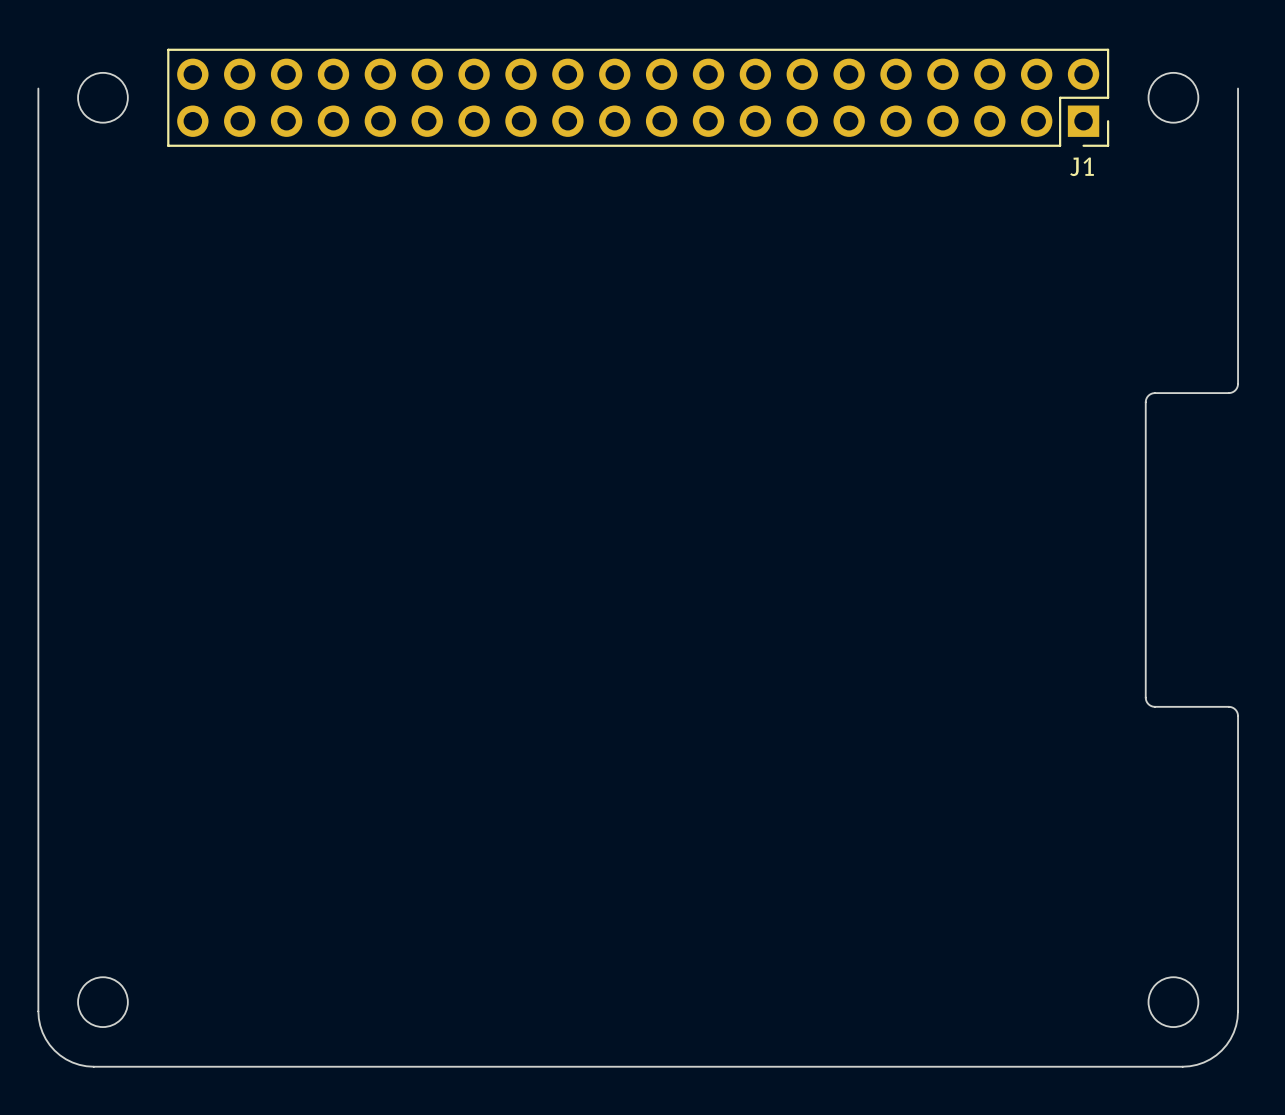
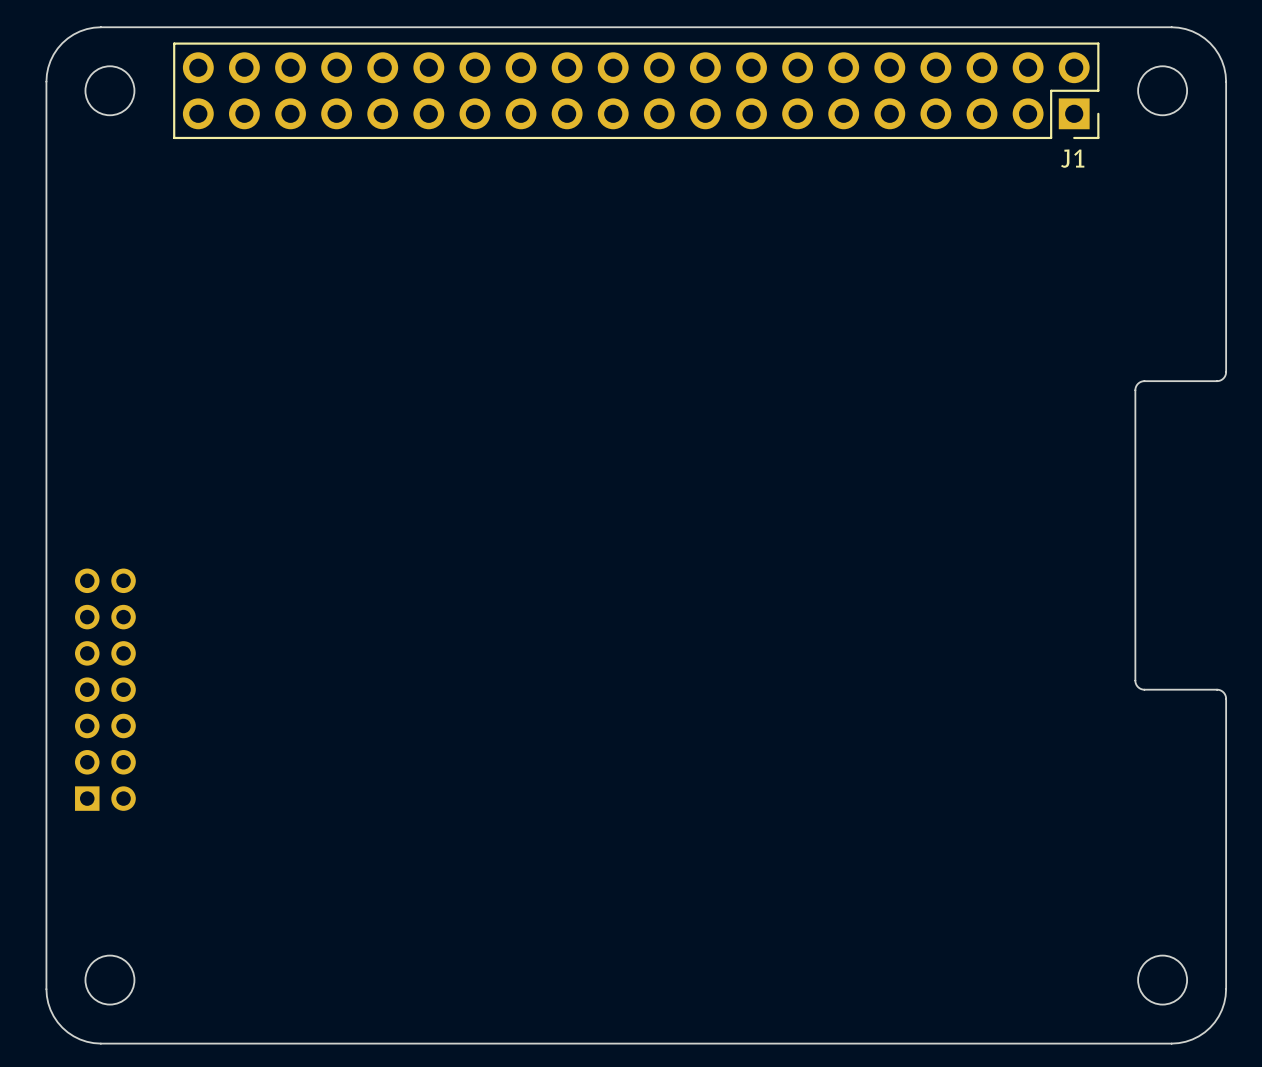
board edge: none -> (1226, 81) (1221, 60) (1210, 43) (1192, 31) (1171, 27) (100, 27) (80, 31) (62, 43) (50, 60) (46, 81)
part: none -> (105, 689)

